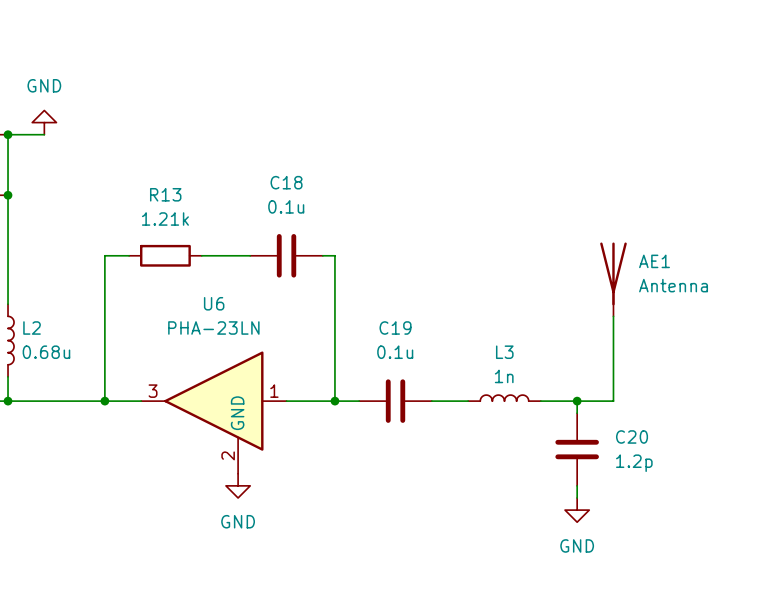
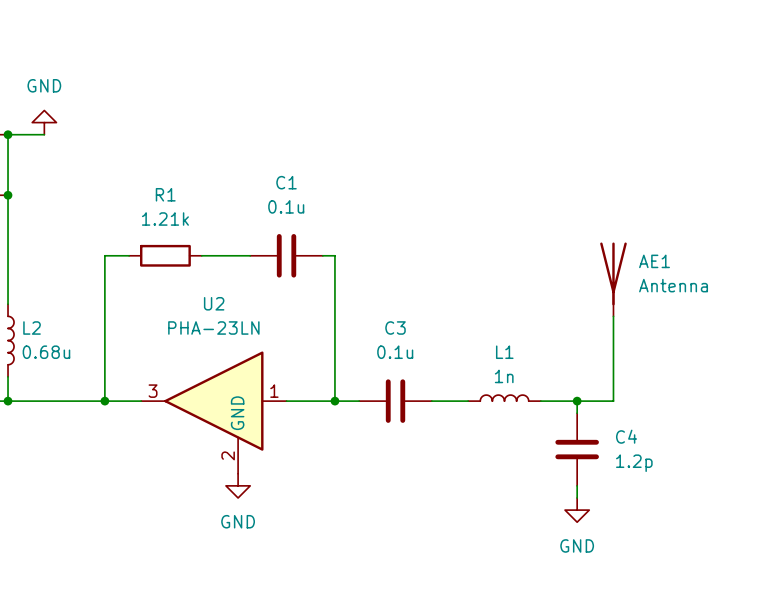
C18 name: C18 (286, 182) -> C1 (286, 182)
R13 name: R13 (165, 194) -> R1 (165, 194)
U6 name: U6 (214, 303) -> U2 (214, 303)
C19 name: C19 (395, 328) -> C3 (395, 328)
L3 name: L3 (504, 352) -> L1 (504, 352)
C20 name: C20 (632, 436) -> C4 (626, 436)

